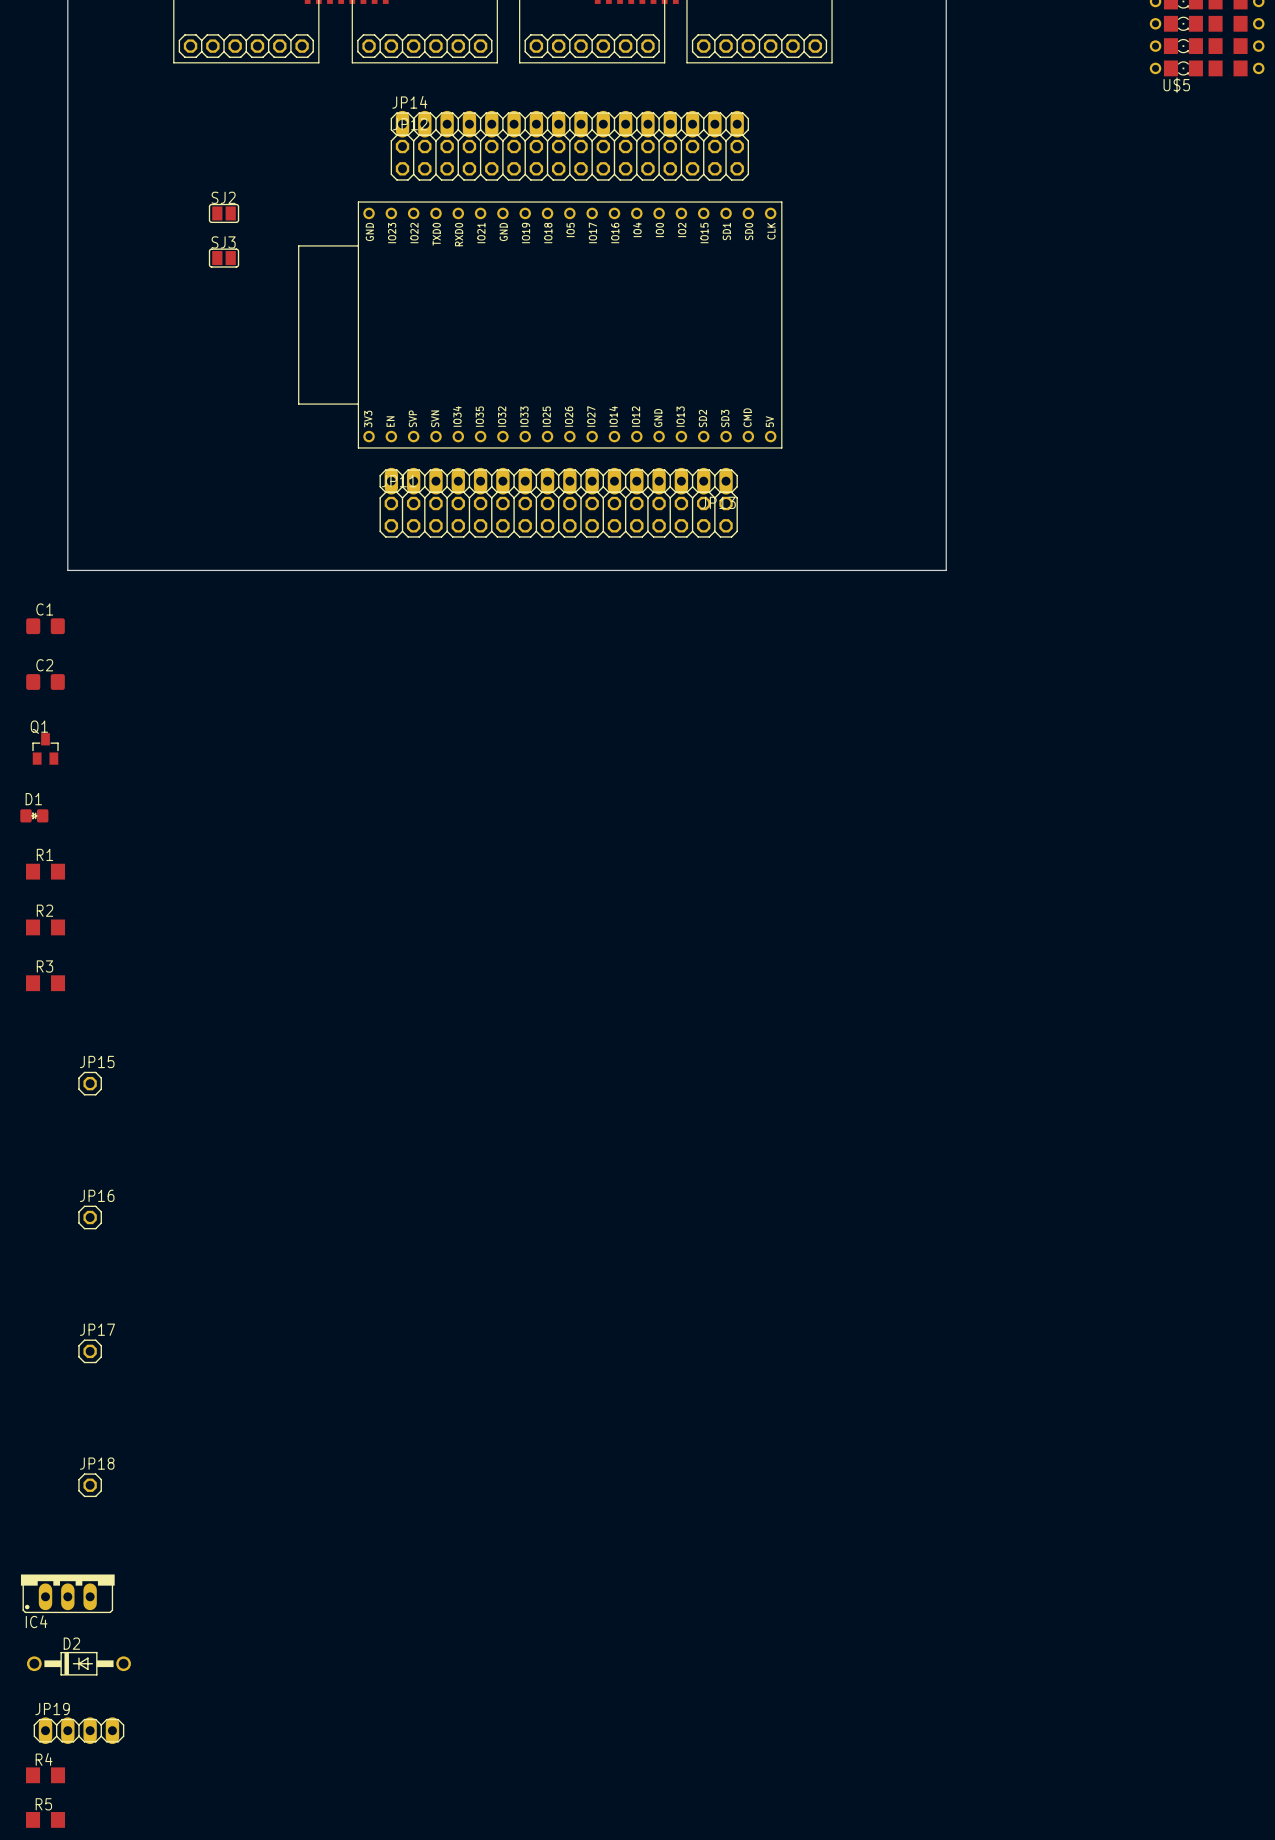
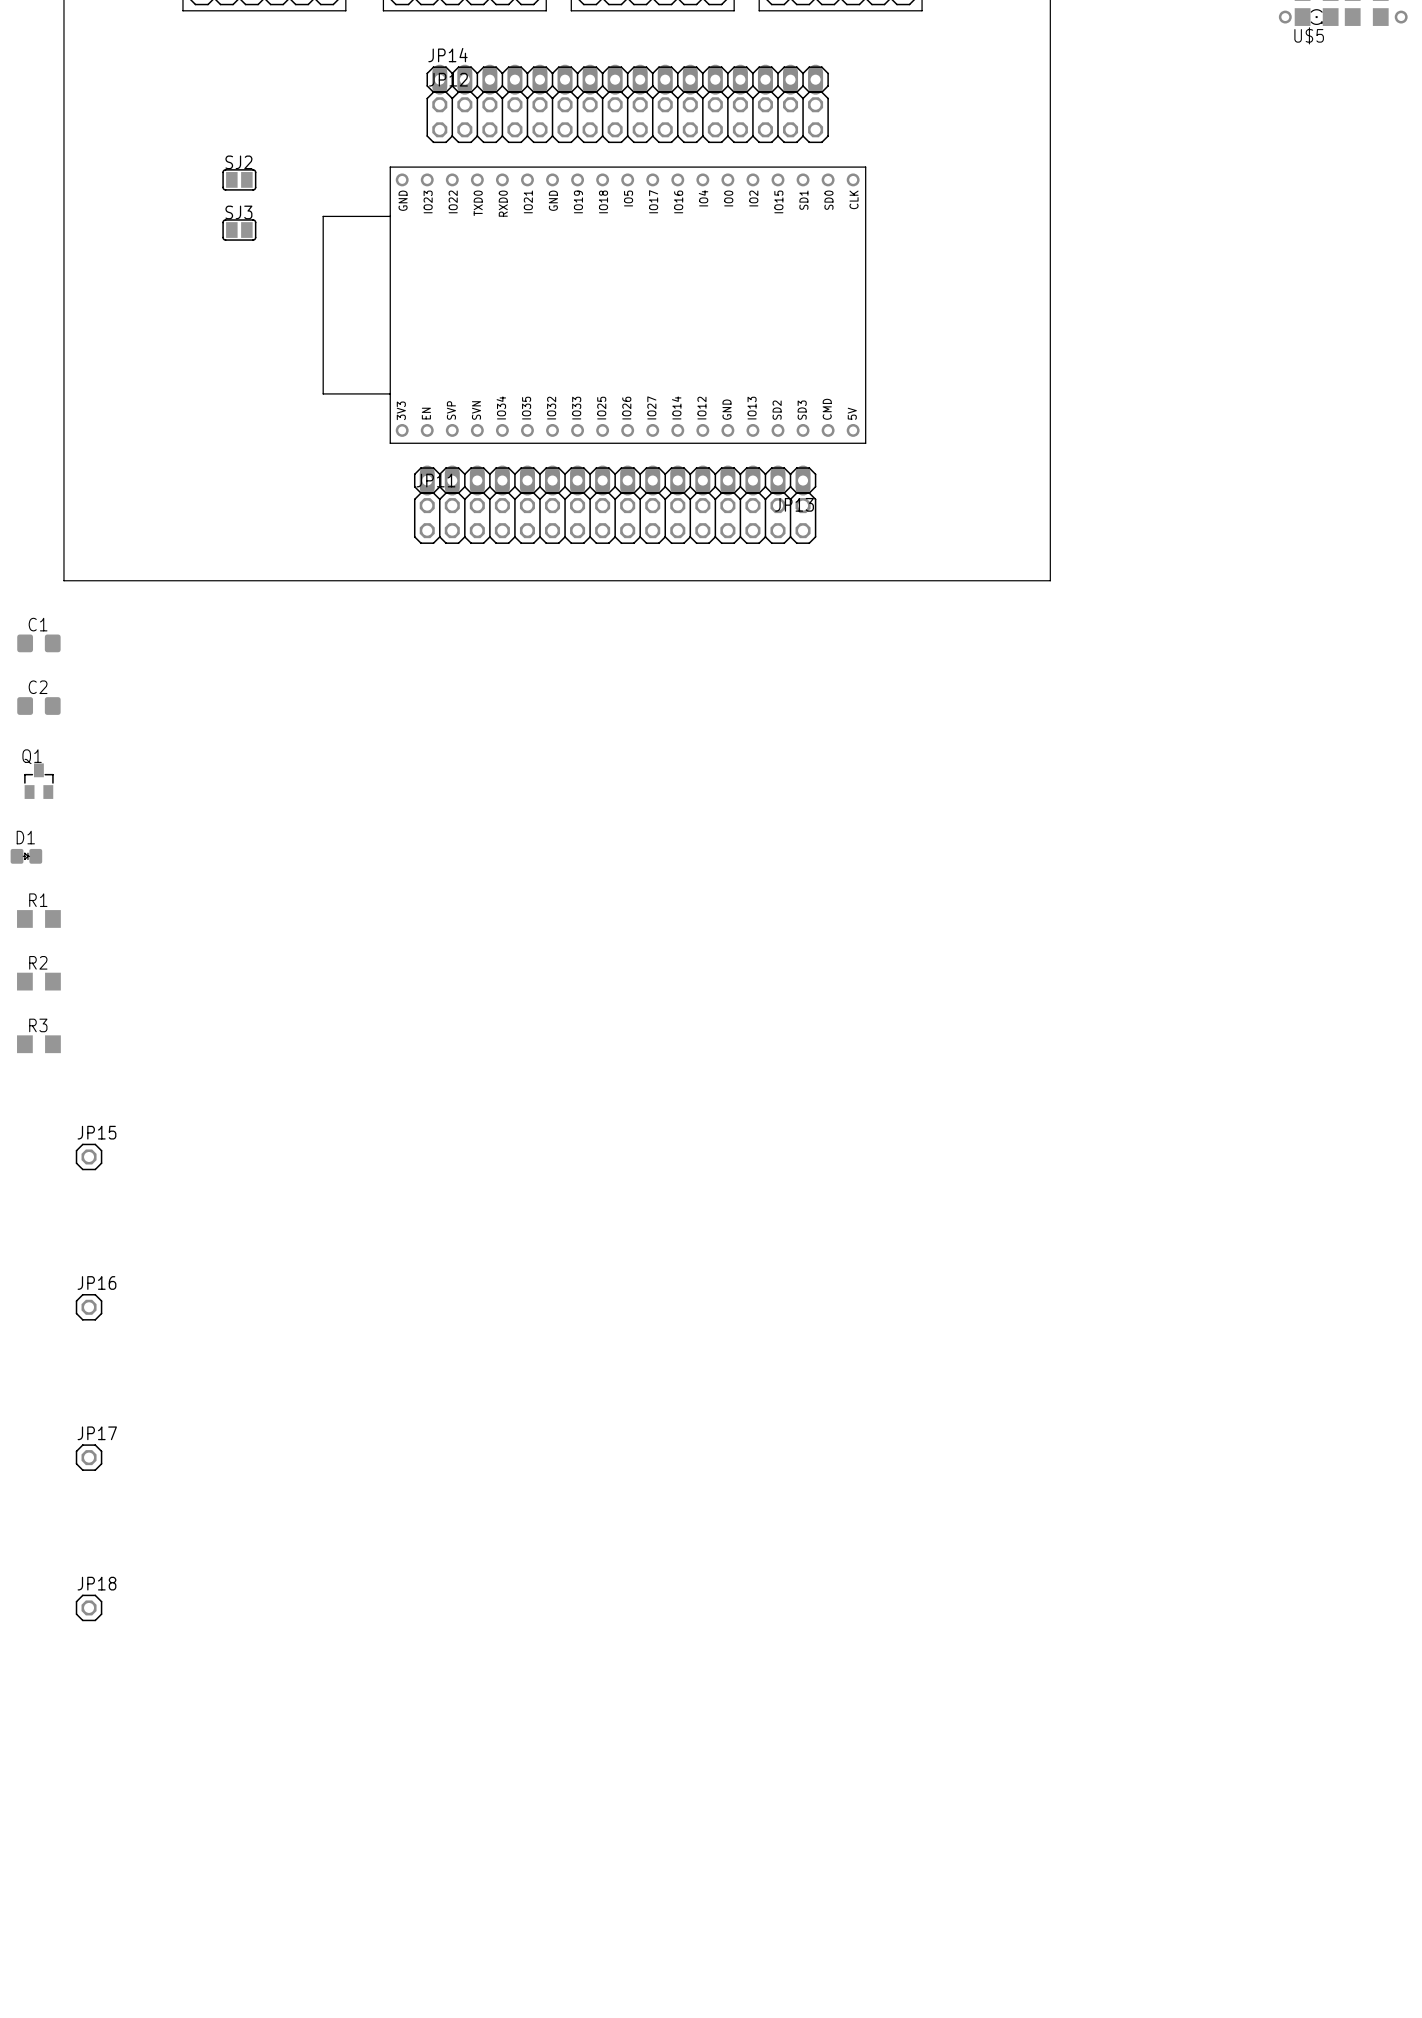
IC4: (67, 1593) -> none
D2: (78, 1663) -> none
JP19: (78, 1730) -> none
R4: (45, 1775) -> none
R5: (45, 1819) -> none

